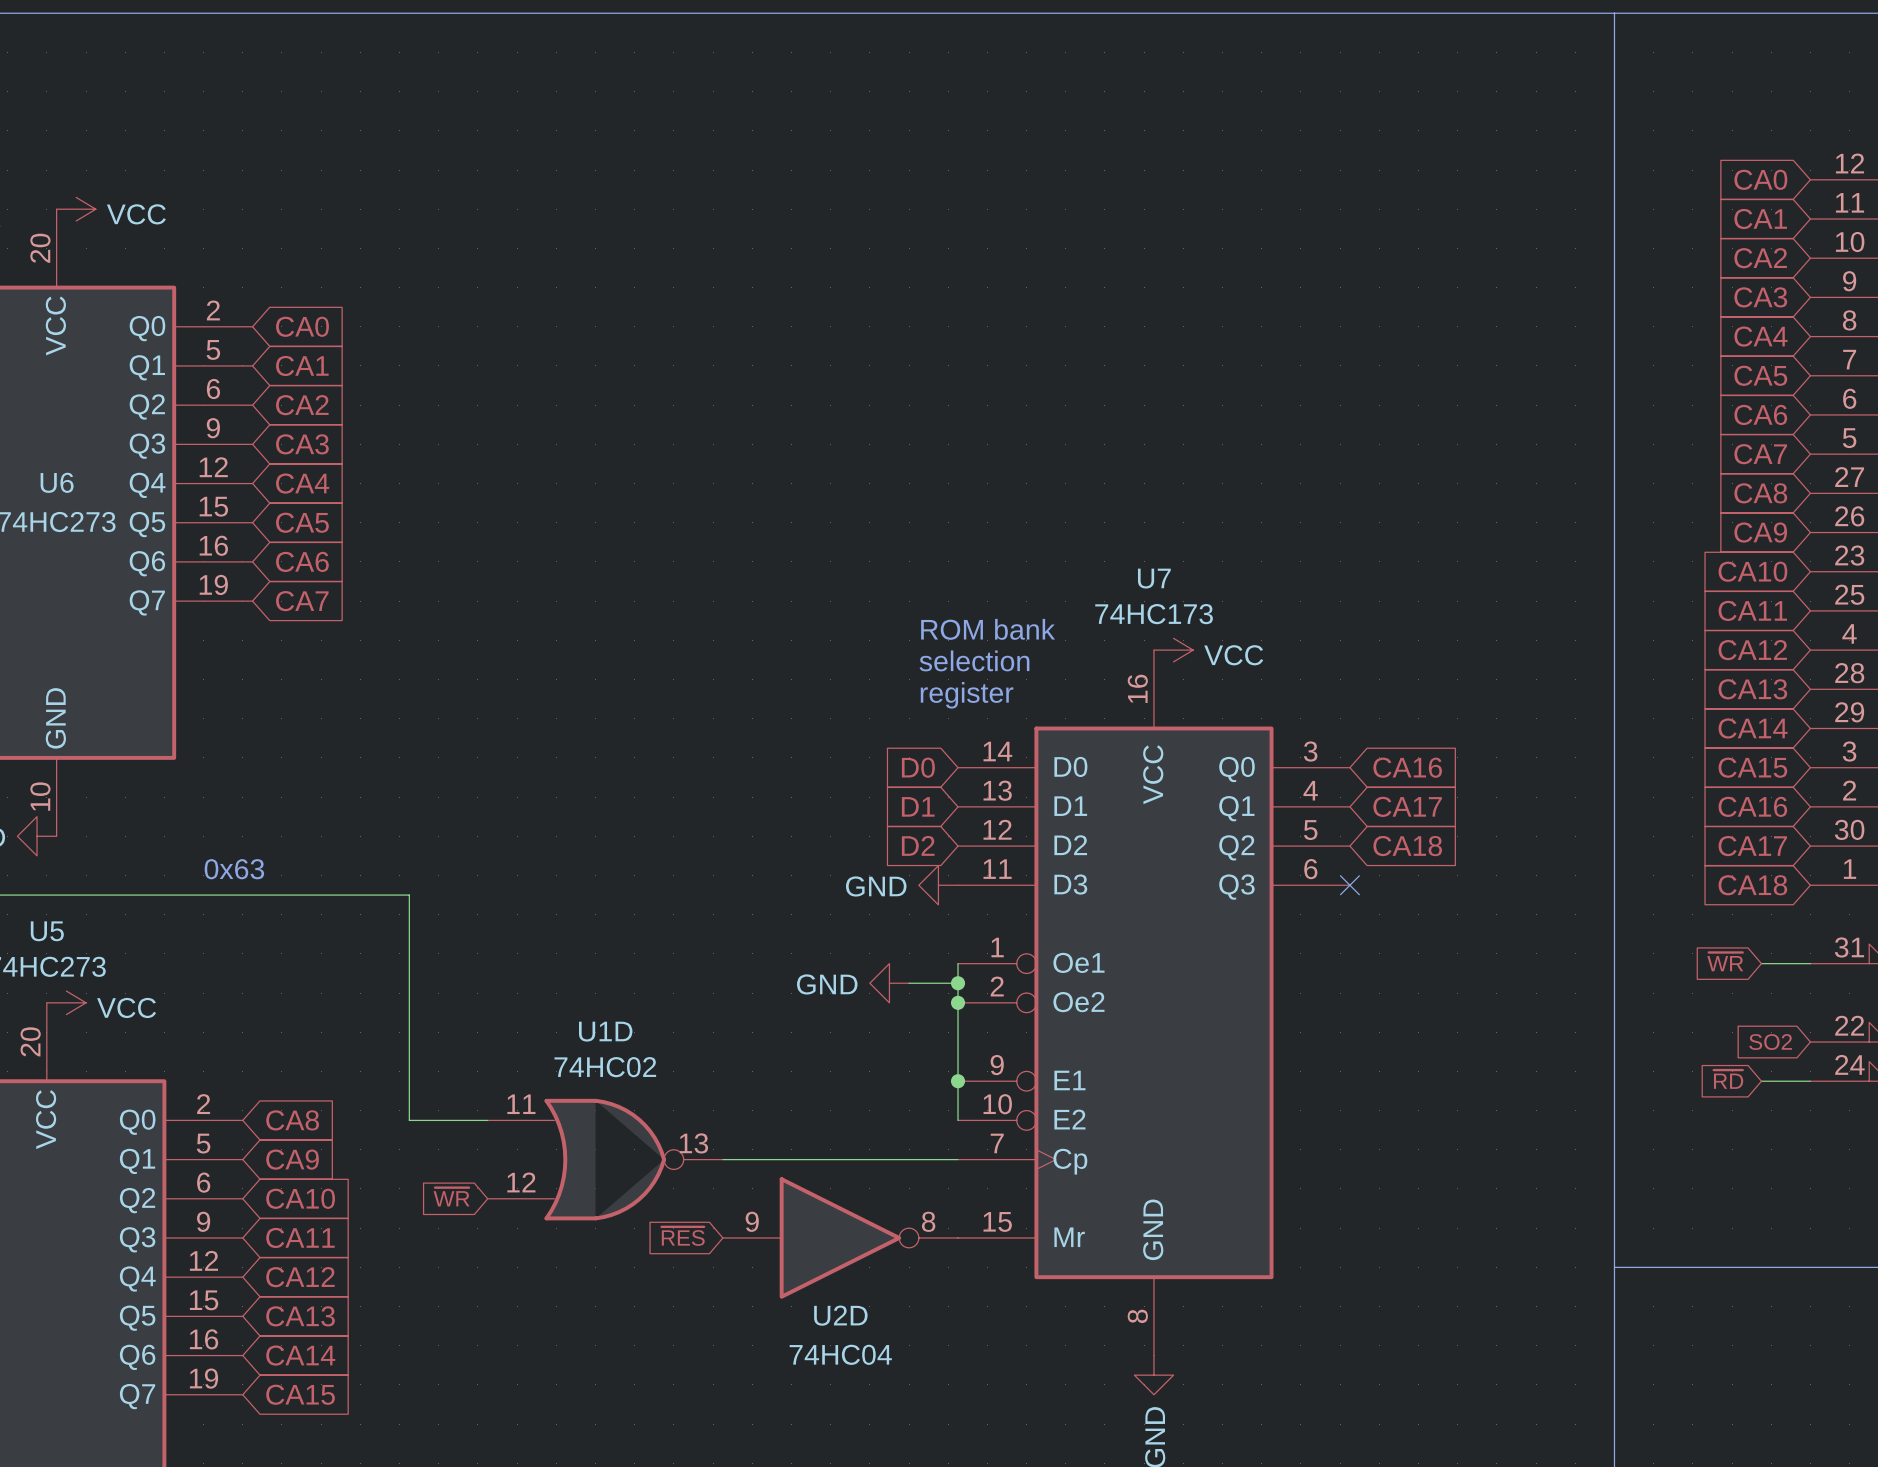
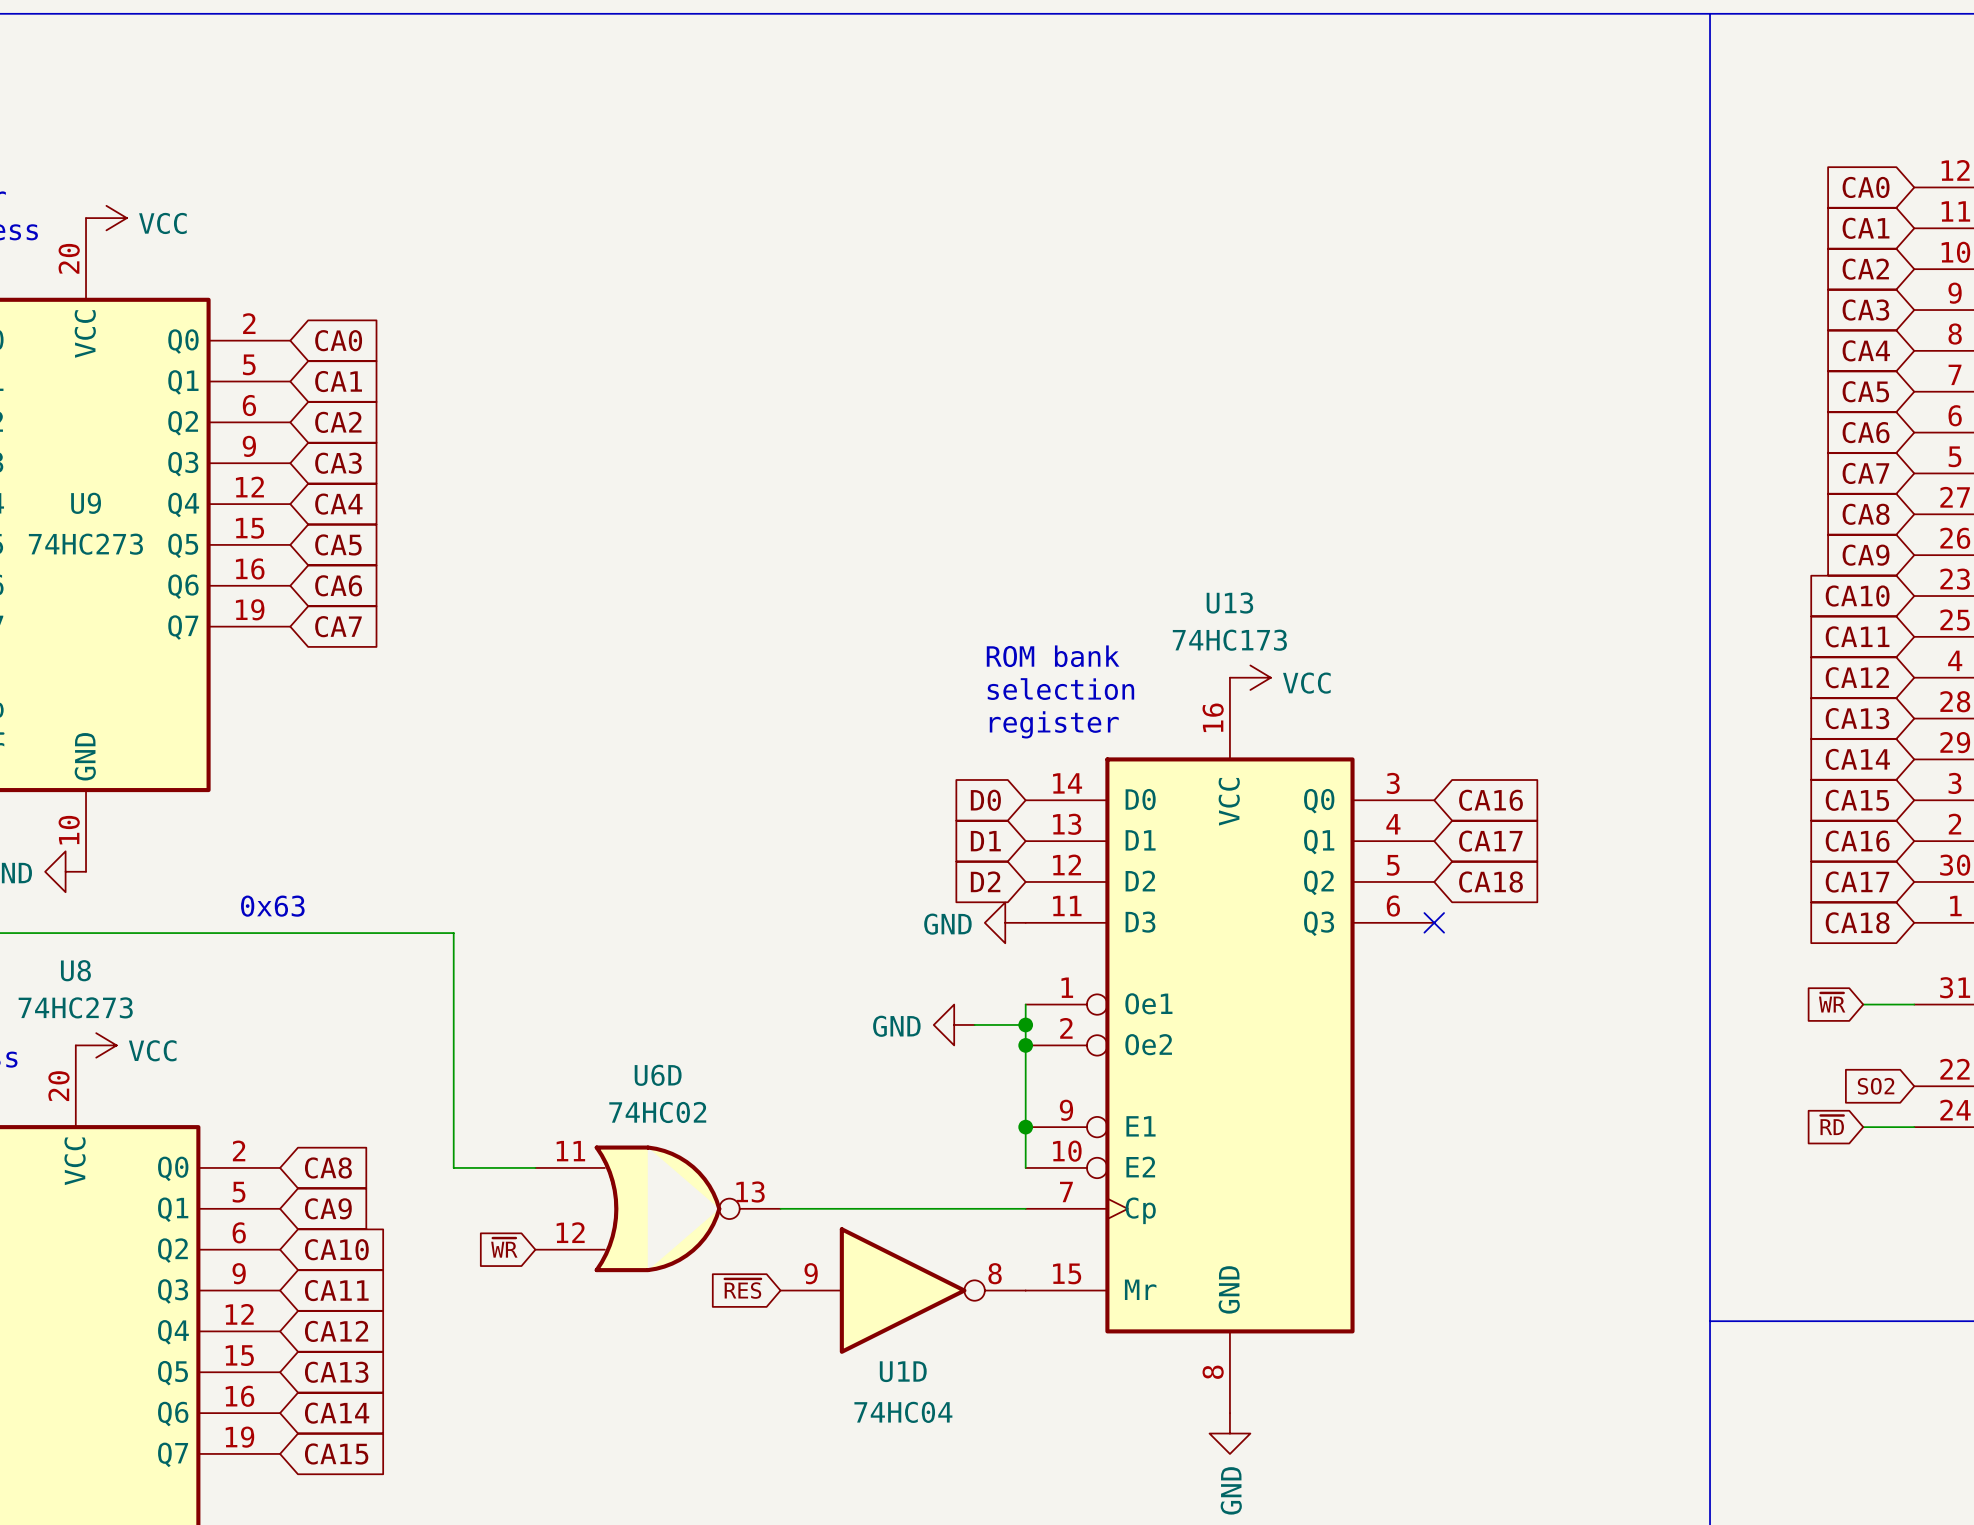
U6 name: U6 (57, 482) -> U9 (86, 503)
U7 name: U7 (1154, 578) -> U13 (1229, 603)
U5 name: U5 (47, 931) -> U8 (75, 970)
U1D name: U1D (605, 1031) -> U6D (658, 1075)
U2D name: U2D (840, 1315) -> U1D (903, 1371)

